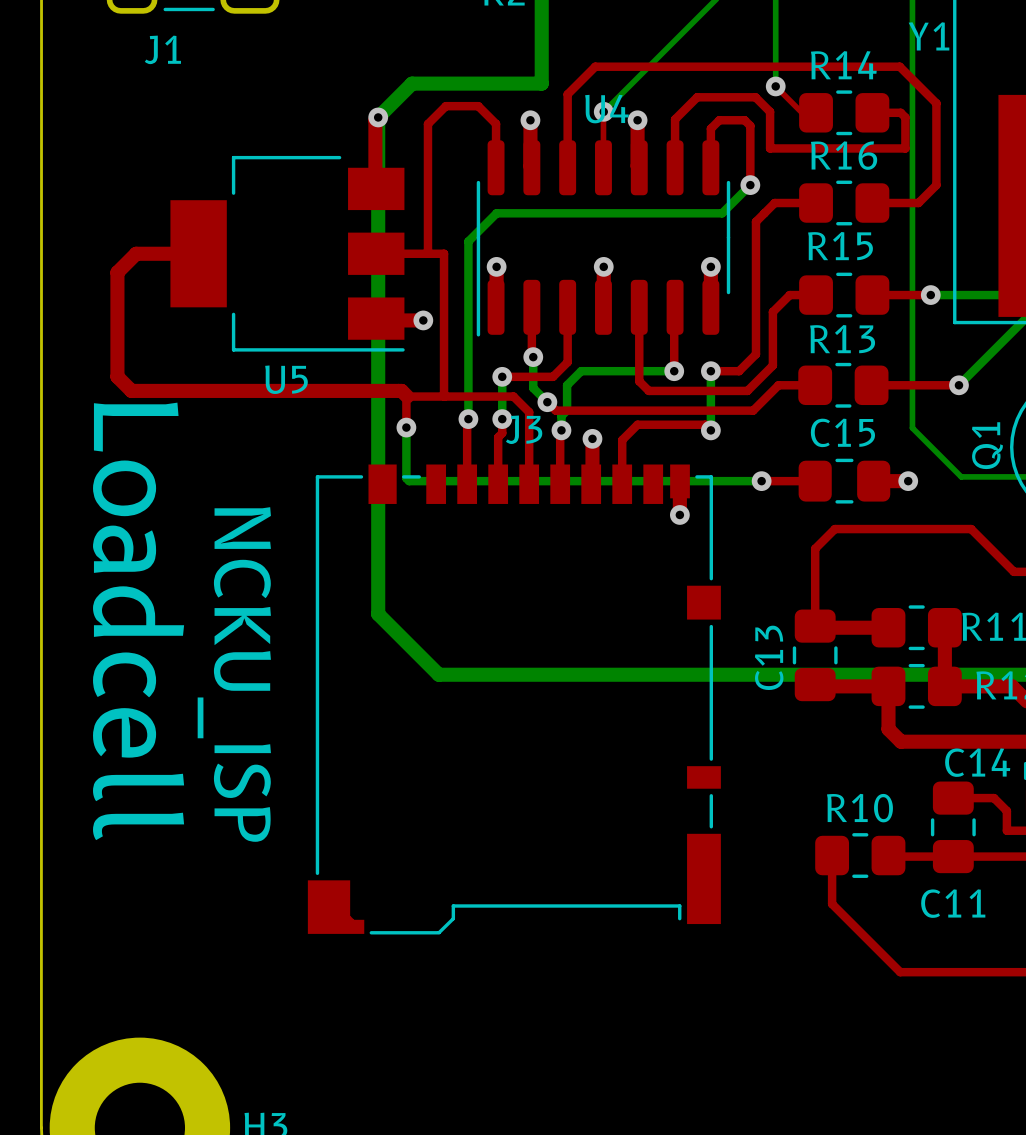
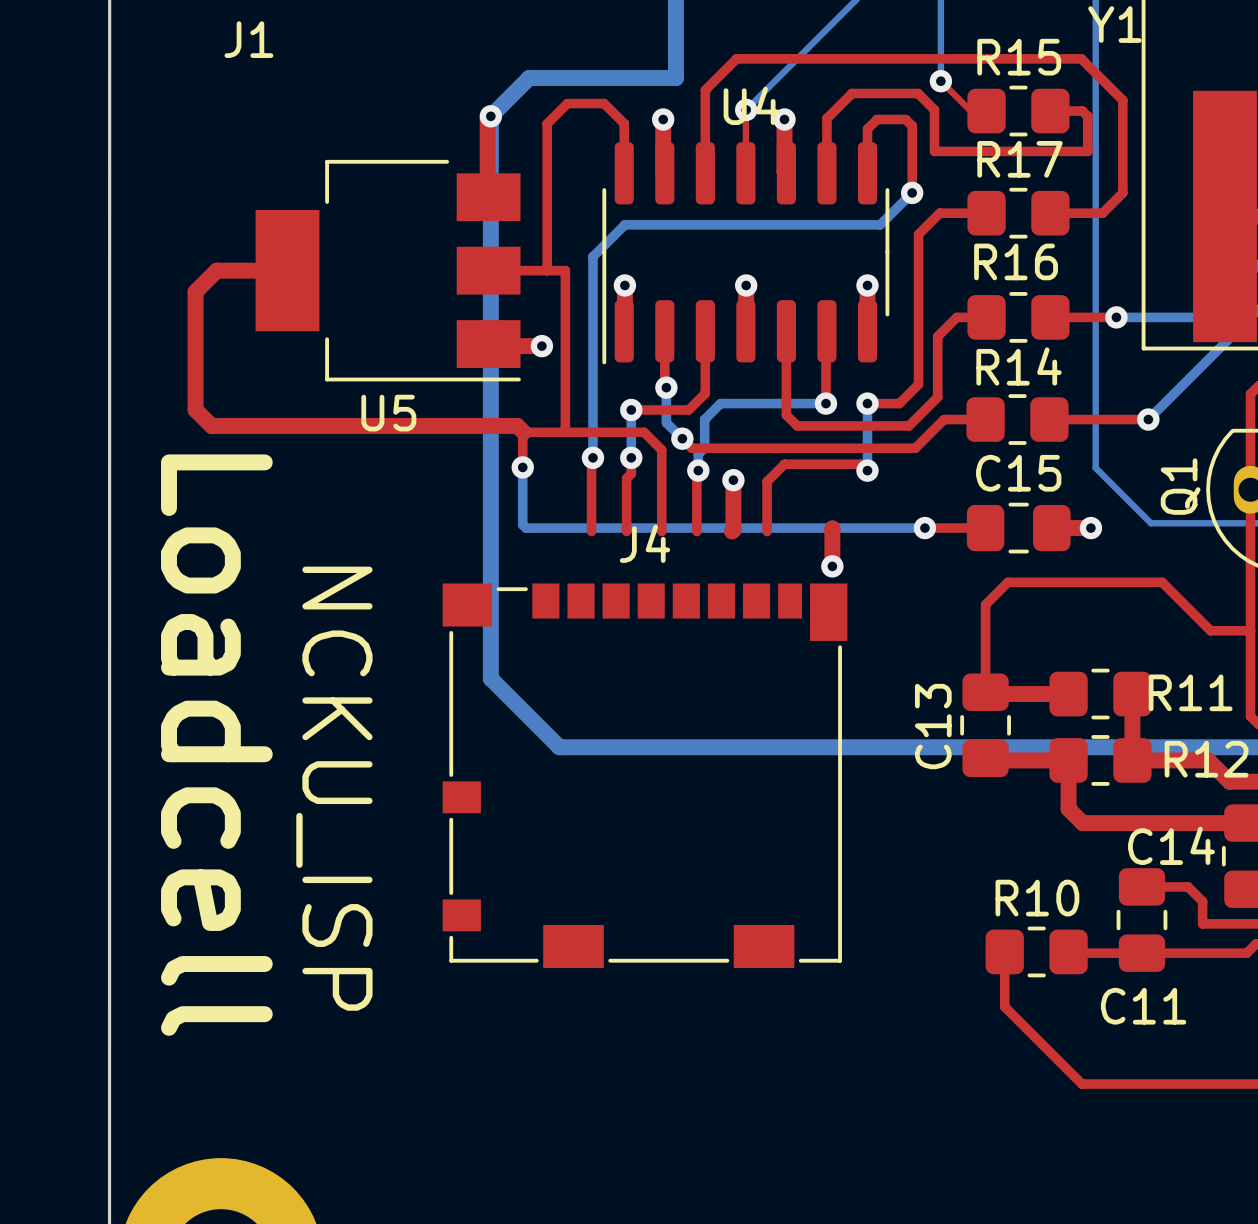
R14 name: R14 (843, 65) -> R15 (1019, 57)
R16 name: R16 (844, 155) -> R17 (1019, 159)
R15 name: R15 (840, 246) -> R16 (1016, 261)
R13 name: R13 (842, 339) -> R14 (1019, 366)
J3: (514, 699) -> none
J4: none -> (645, 775)

